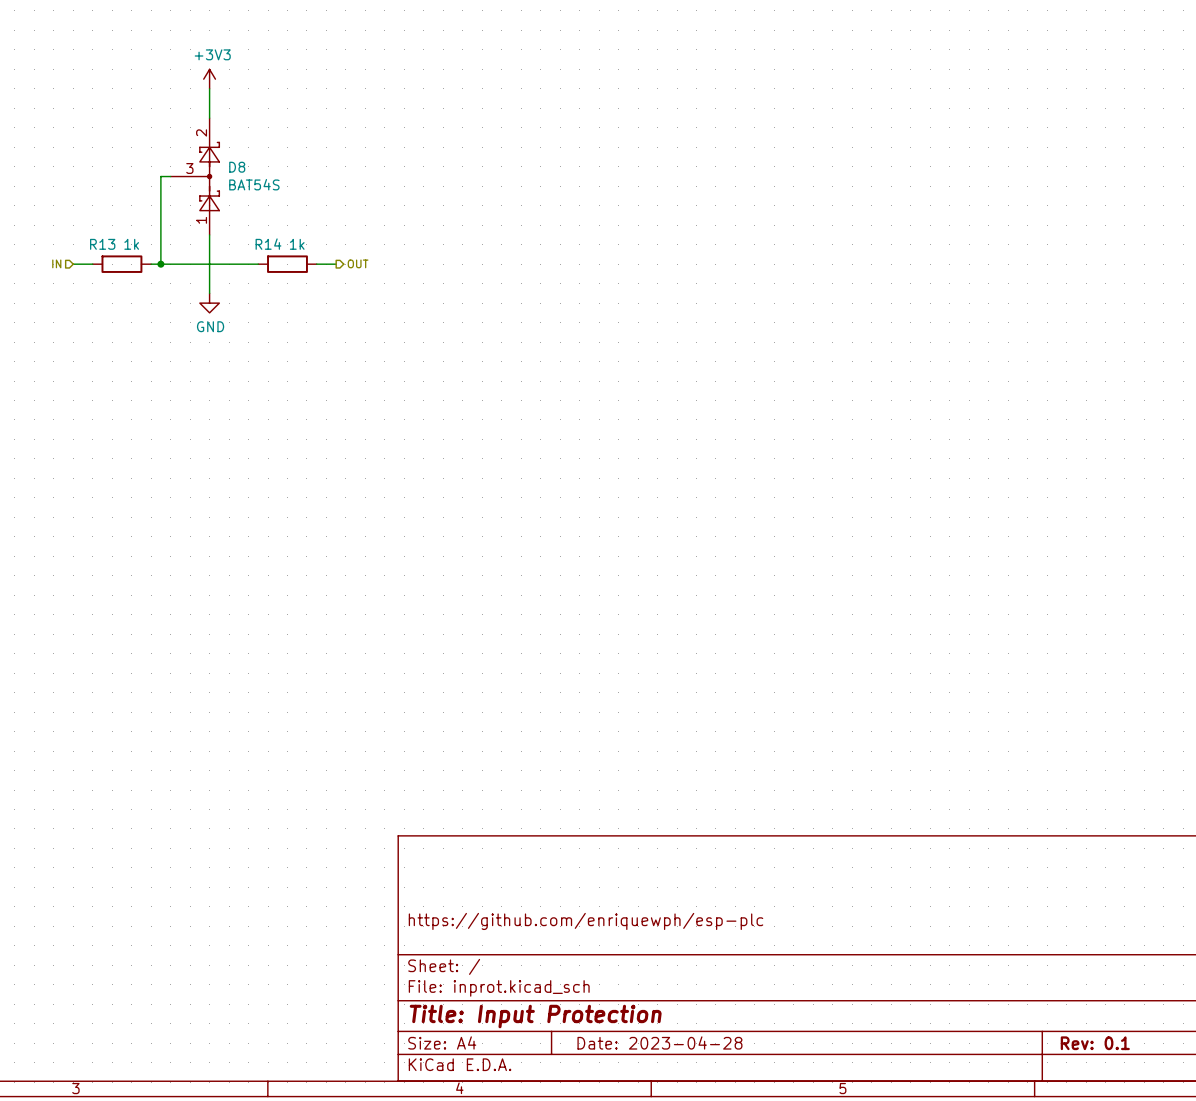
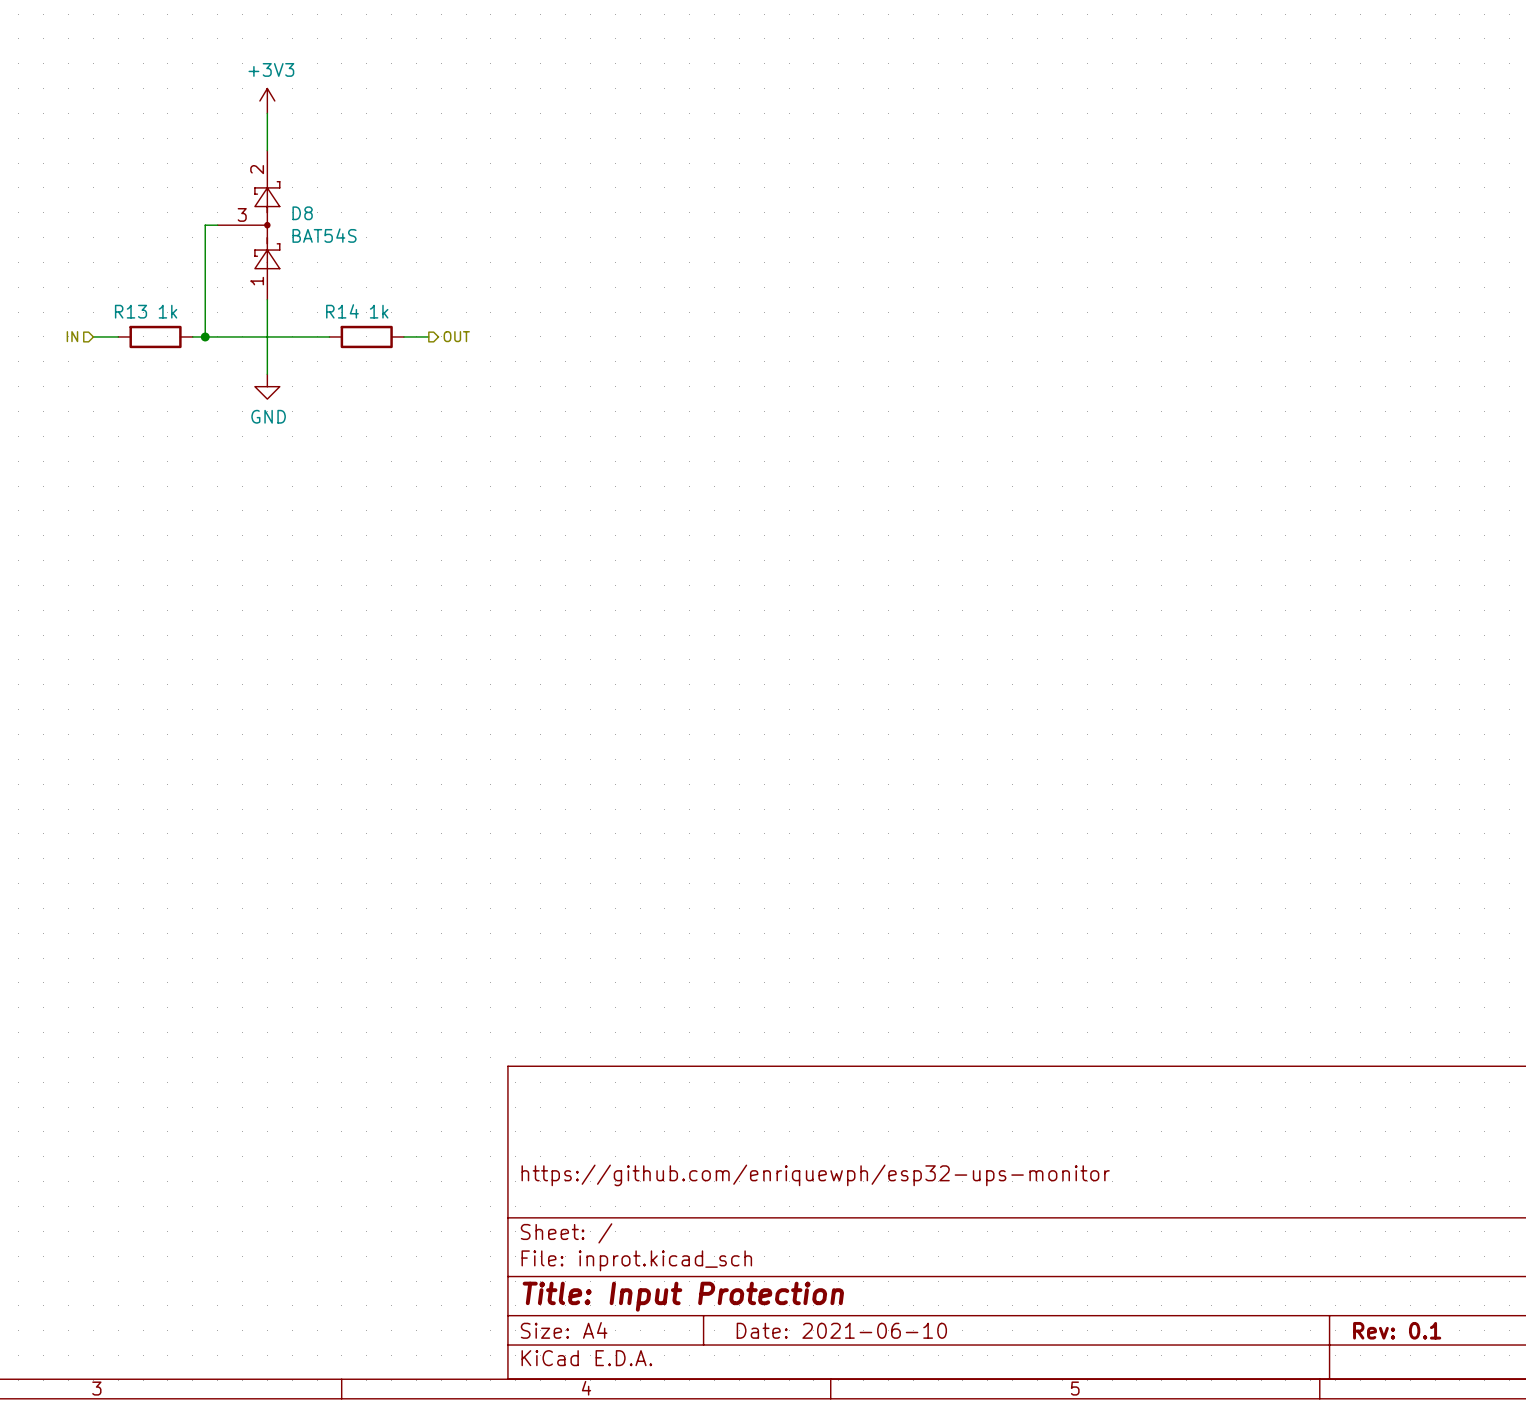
title block: https://github.com/enriquewph/esp-plc (586, 921) -> https://github.com/enriquewph/esp32-ups-monitor (815, 1175)
title block: Date: 2023-04-28 (659, 1042) -> Date: 2021-06-10 (841, 1330)

